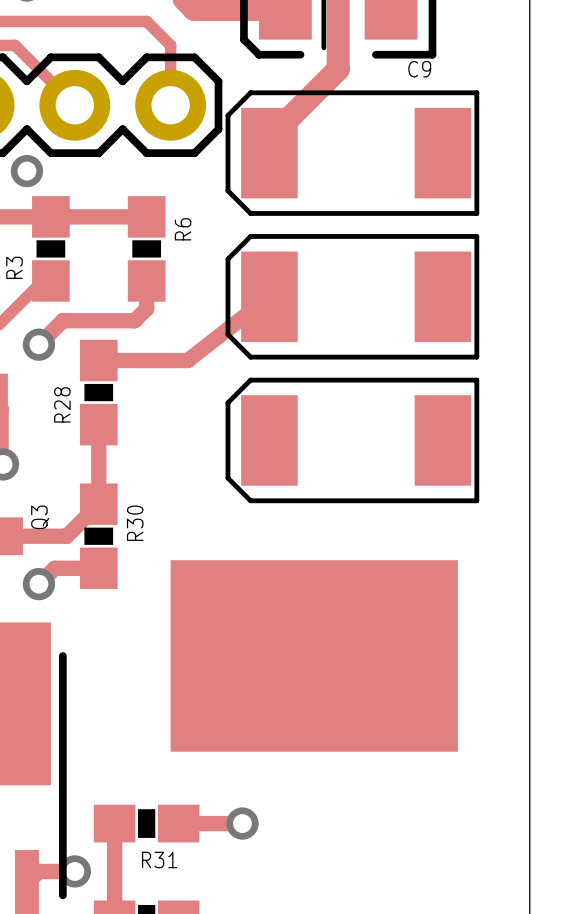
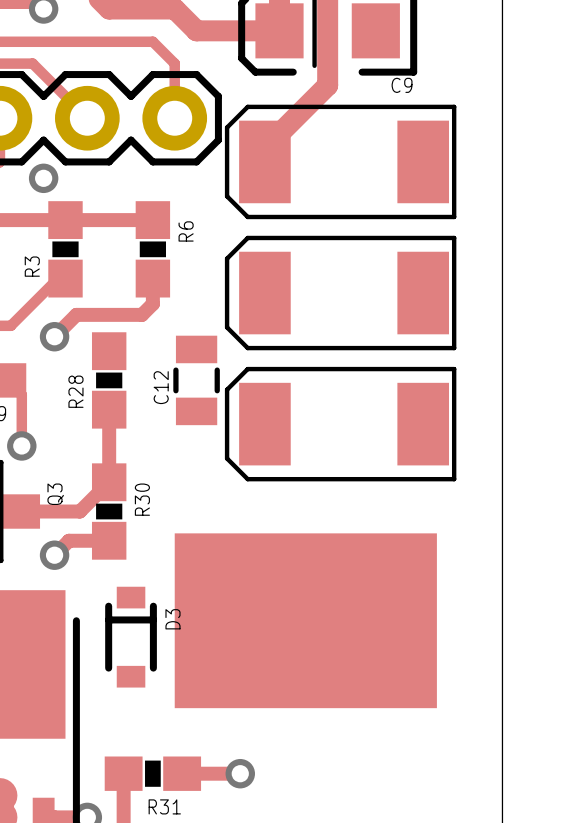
track: (269, 296) (187, 360) (98, 360) -> none
C12: none -> (196, 380)
D3: none -> (131, 637)

